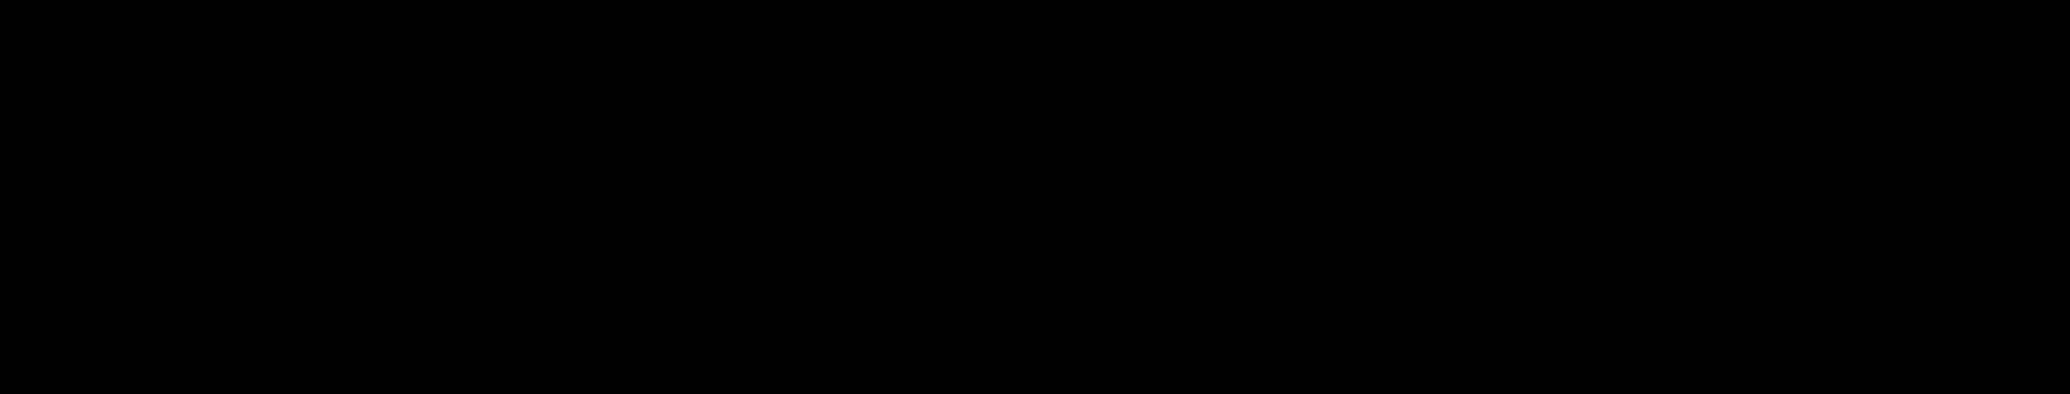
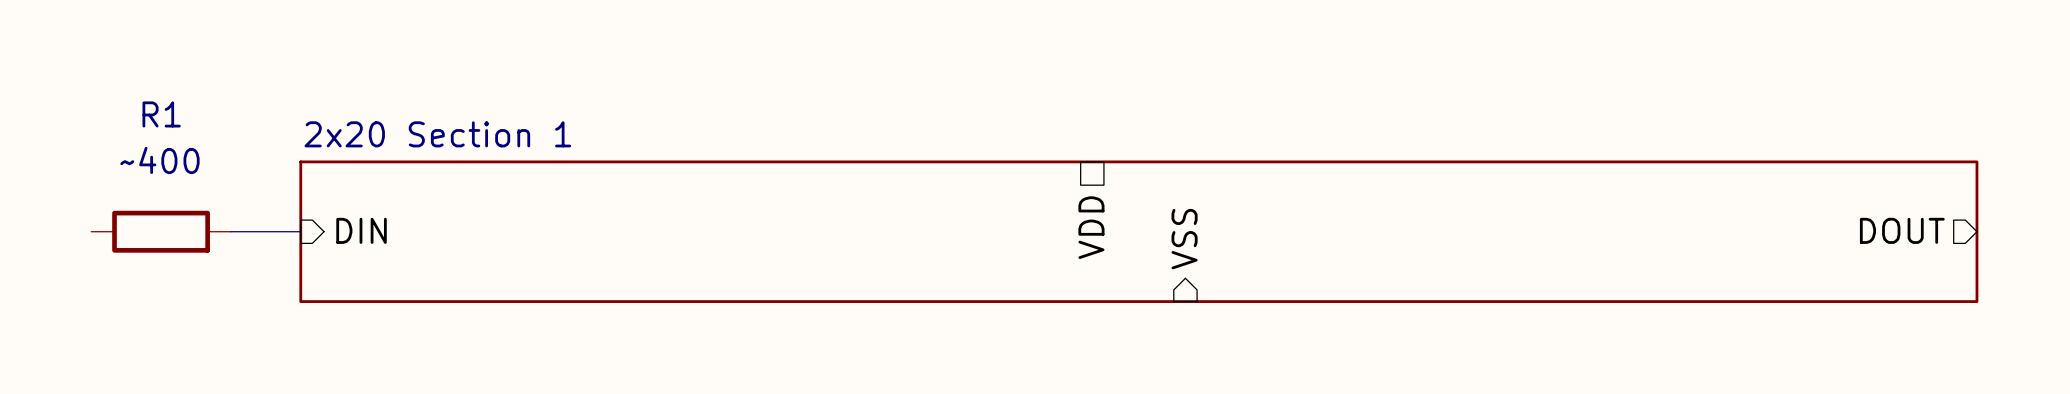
sheet pin: none -> VDD (1091, 227)
sheet pin: none -> DIN (361, 230)
sheet pin: none -> DOUT (1902, 230)
R1: none -> ~400 (161, 231)
wire: none -> (230, 231) (300, 231)
sheet 2x20 Section 1: none -> (1138, 231)
sheet pin: none -> VSS (1184, 239)

